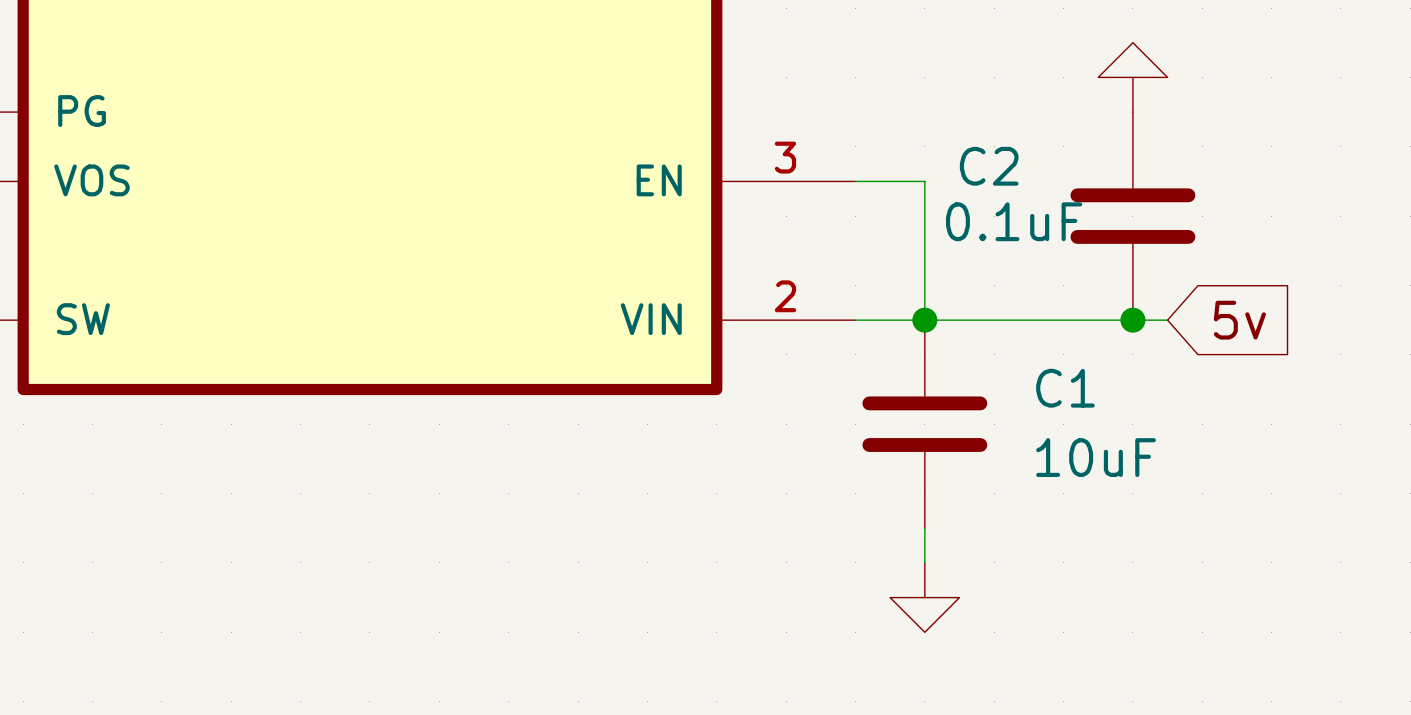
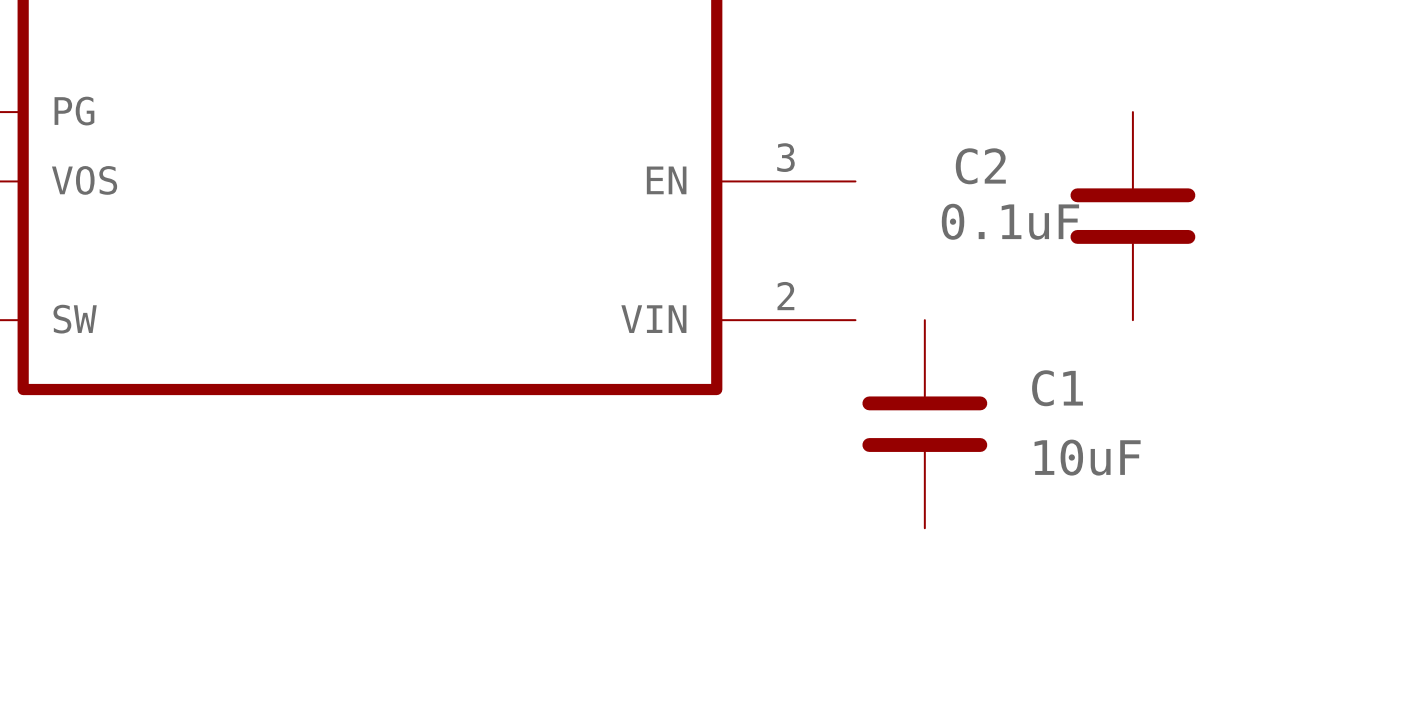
power symbol: (1132, 77) -> none
wire: (855, 181) (924, 181) (924, 320) -> none
wire: (855, 320) (1167, 320) -> none
junction: (924, 320) -> none
junction: (1132, 320) -> none
global label: 5v (1239, 320) -> none
wire: (924, 528) (924, 562) -> none
power symbol: (924, 597) -> none

